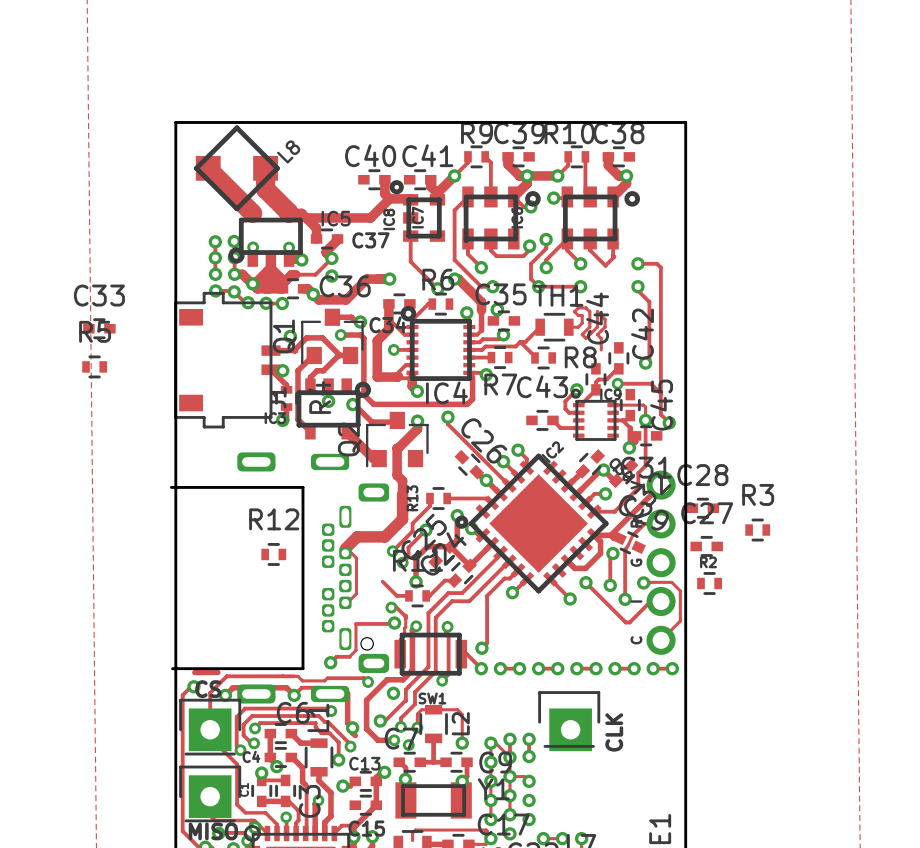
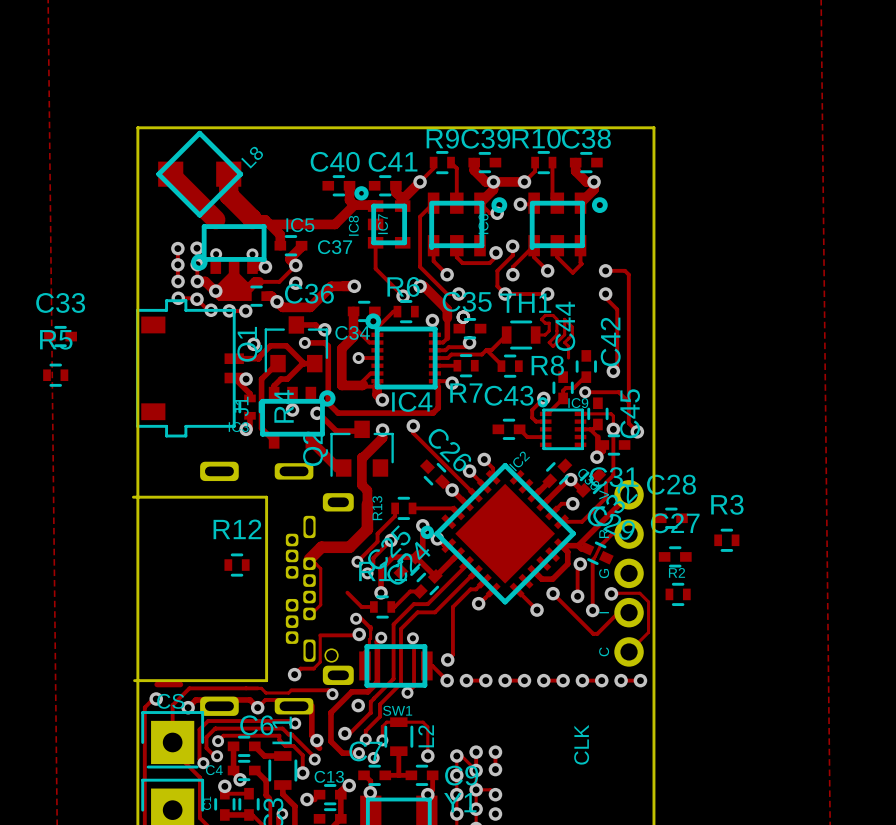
part: (569, 721) -> none

